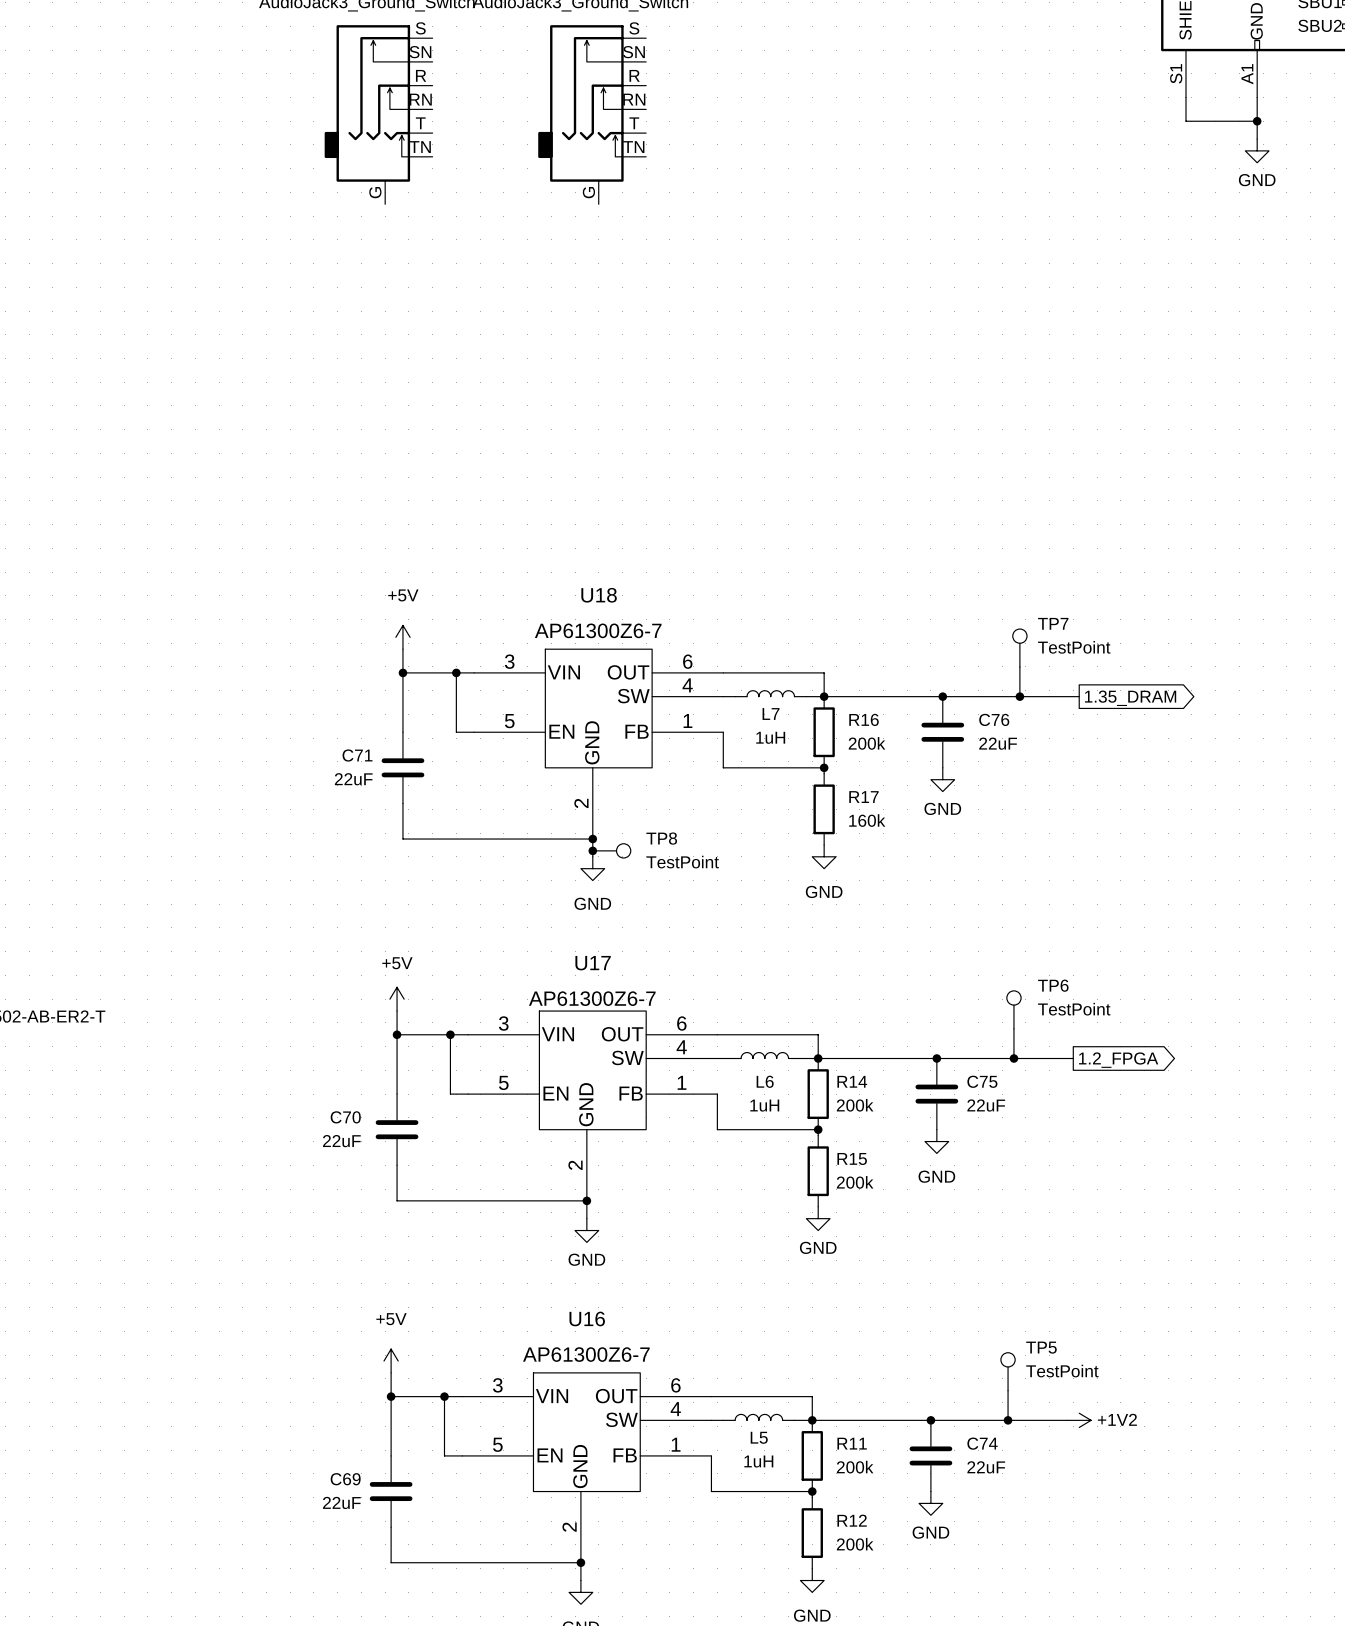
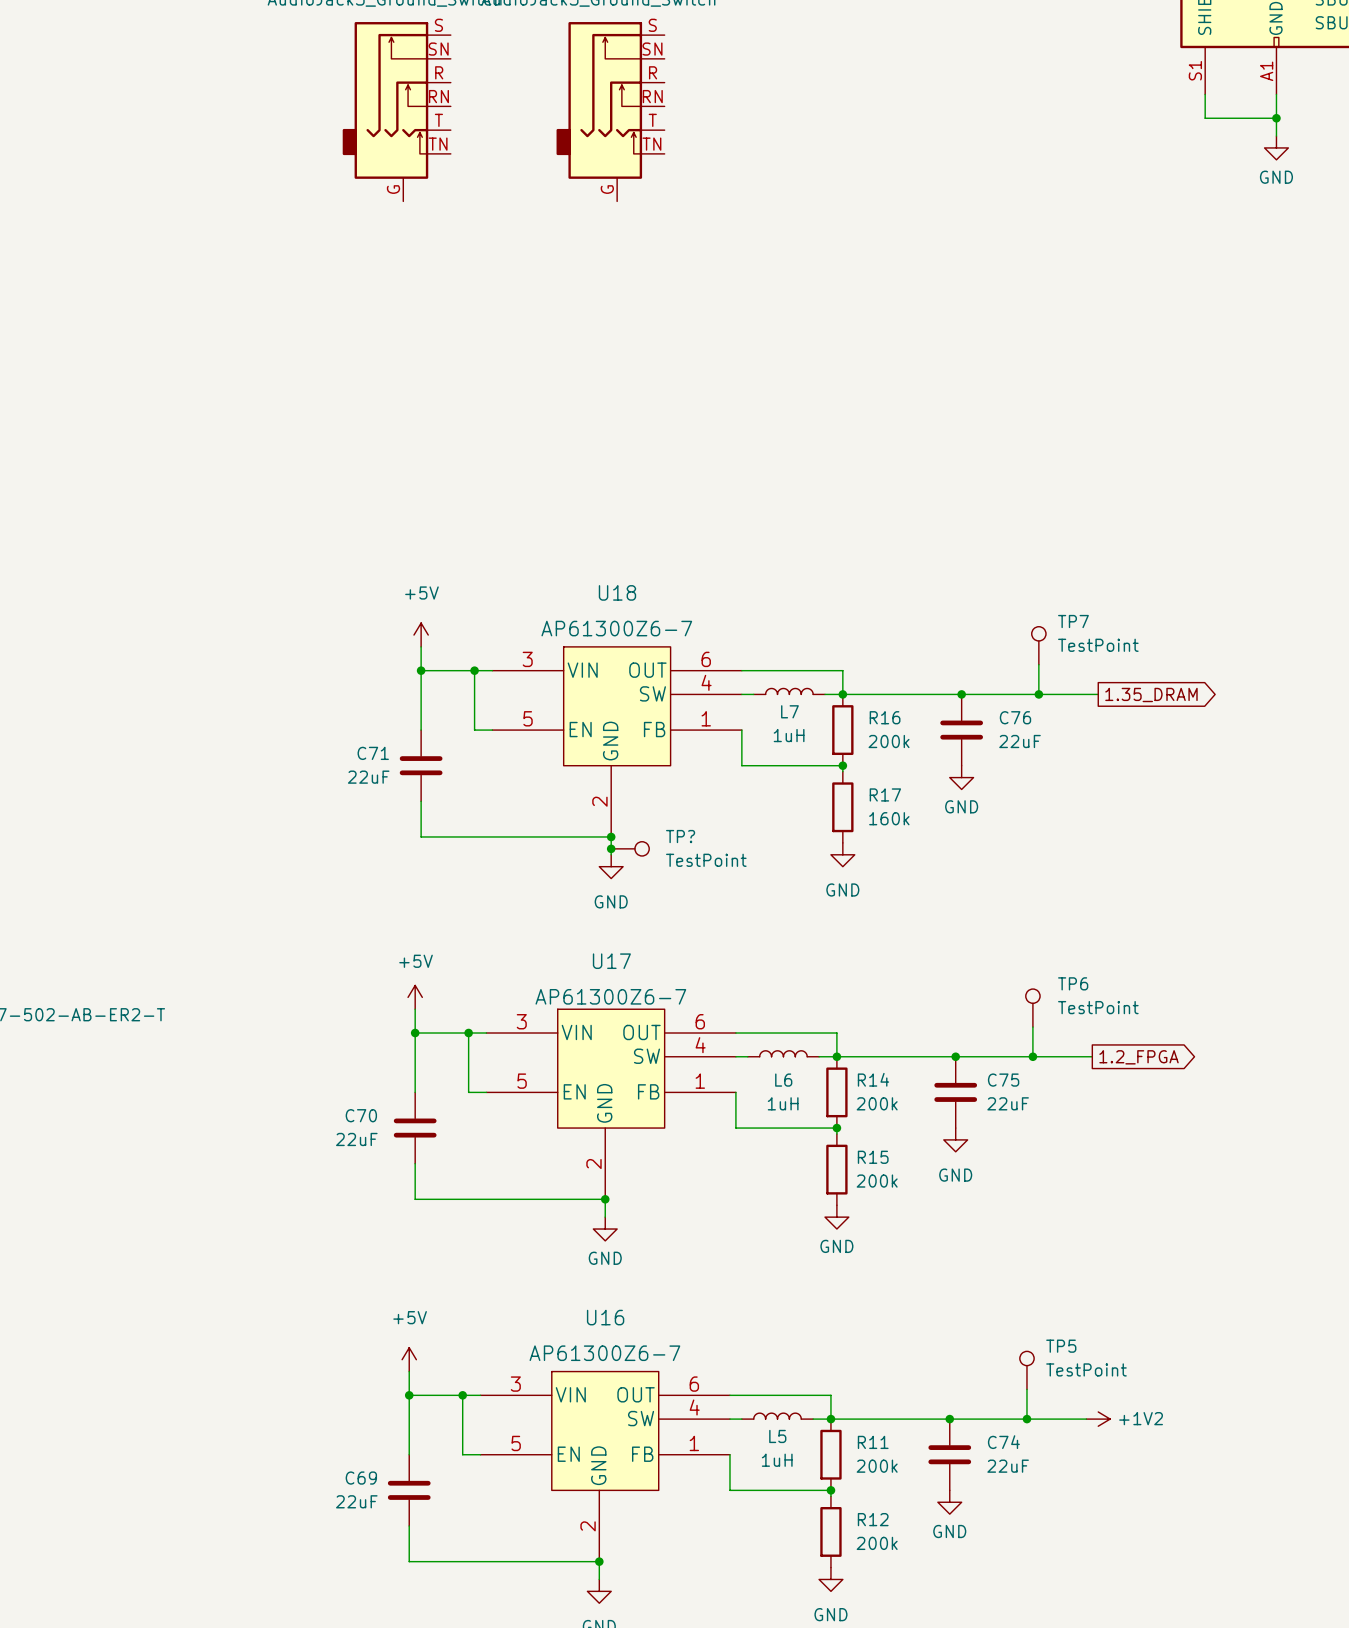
TP8 name: TP8 (661, 838) -> TP? (680, 836)

